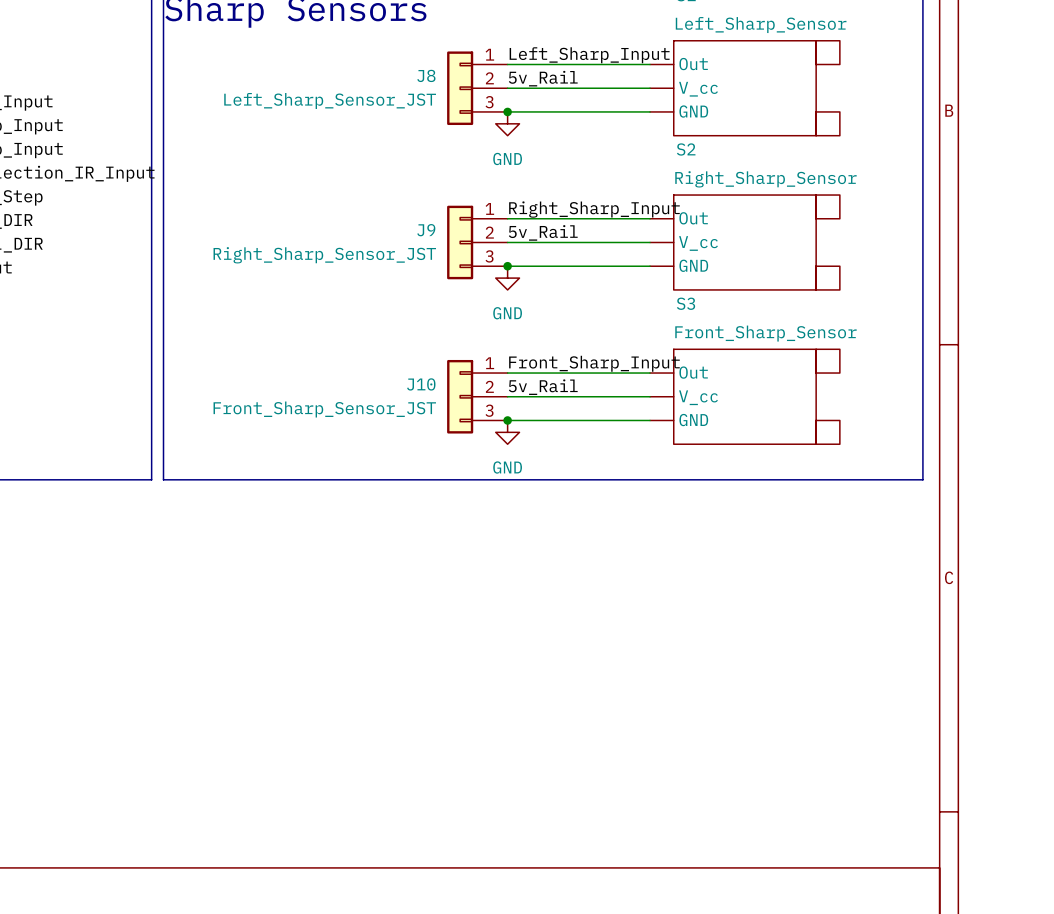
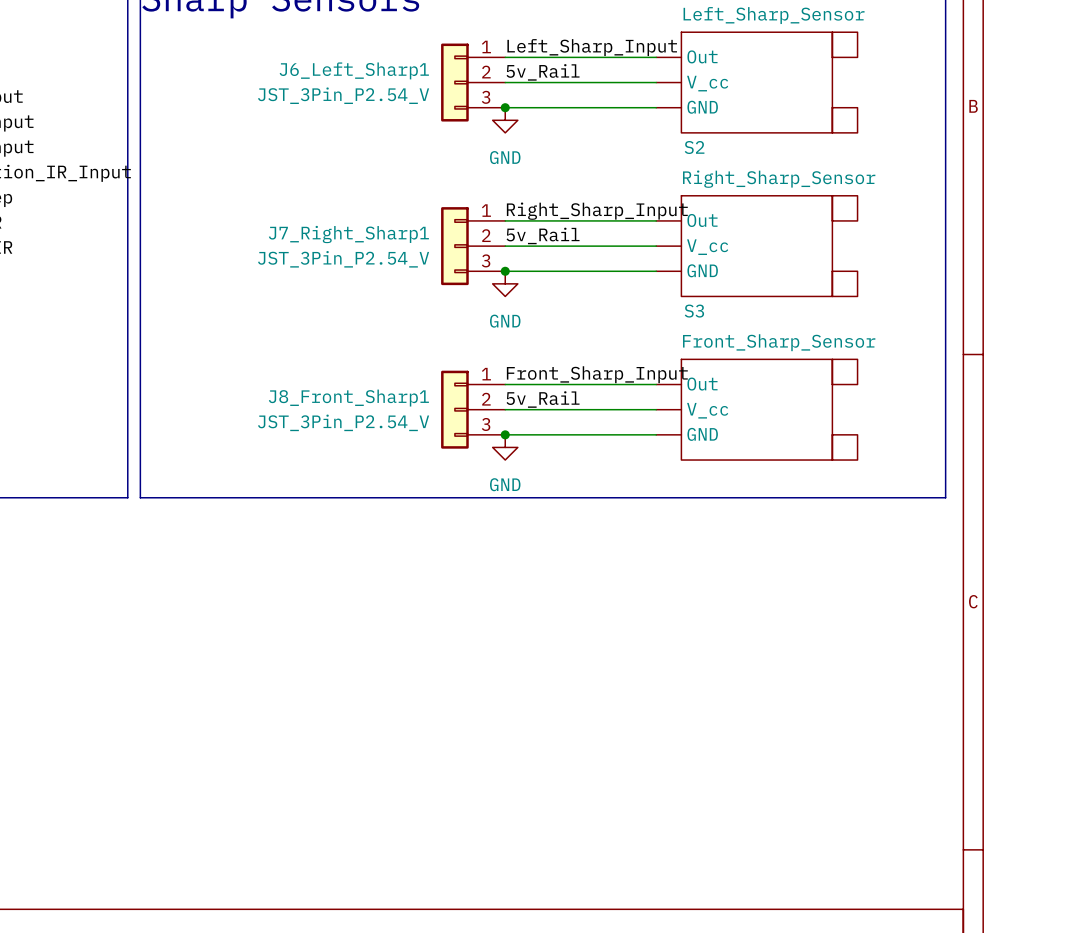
J8 name: J8 (426, 75) -> J6_Left_Sharp1 (354, 70)
J8 value: Left_Sharp_Sensor_JST (330, 100) -> JST_3Pin_P2.54_V (343, 95)
J9 name: J9 (426, 230) -> J7_Right_Sharp1 (348, 234)
J9 value: Right_Sharp_Sensor_JST (324, 255) -> JST_3Pin_P2.54_V (343, 259)
J10 name: J10 (421, 384) -> J8_Front_Sharp1 (348, 398)
J10 value: Front_Sharp_Sensor_JST (324, 409) -> JST_3Pin_P2.54_V (343, 422)

